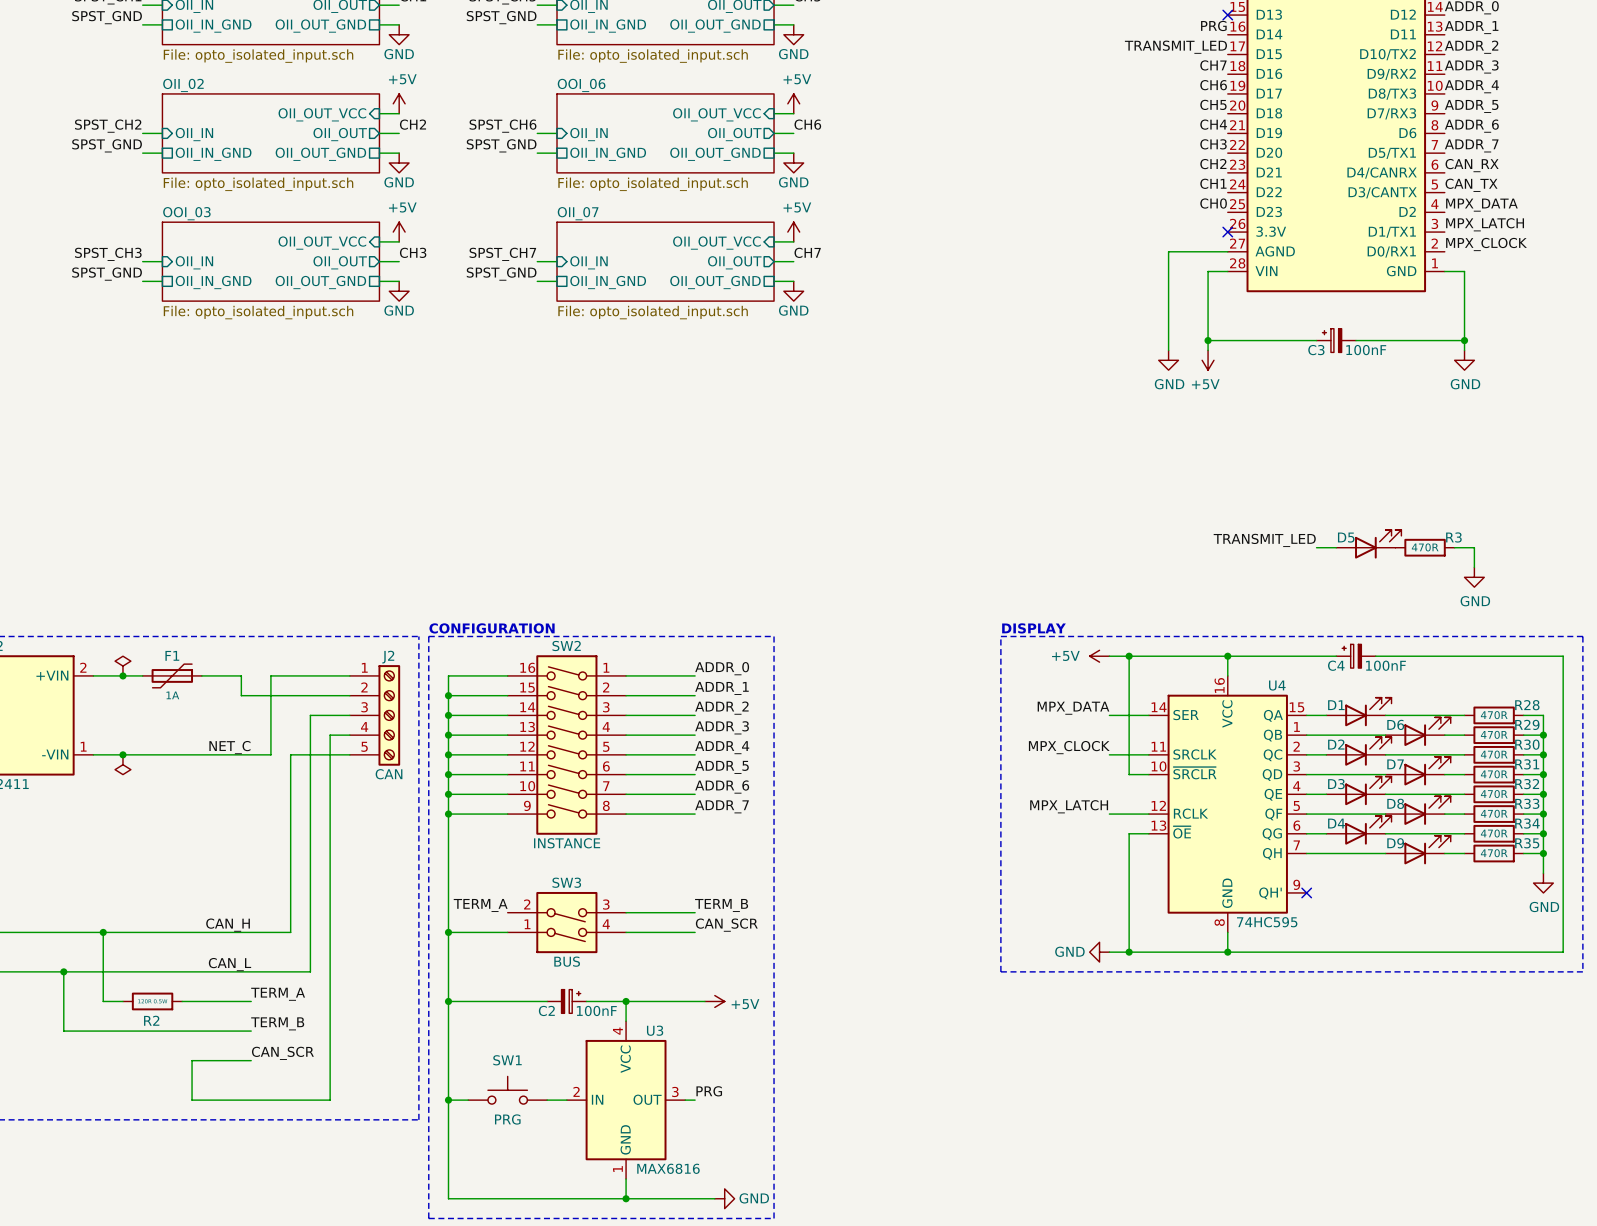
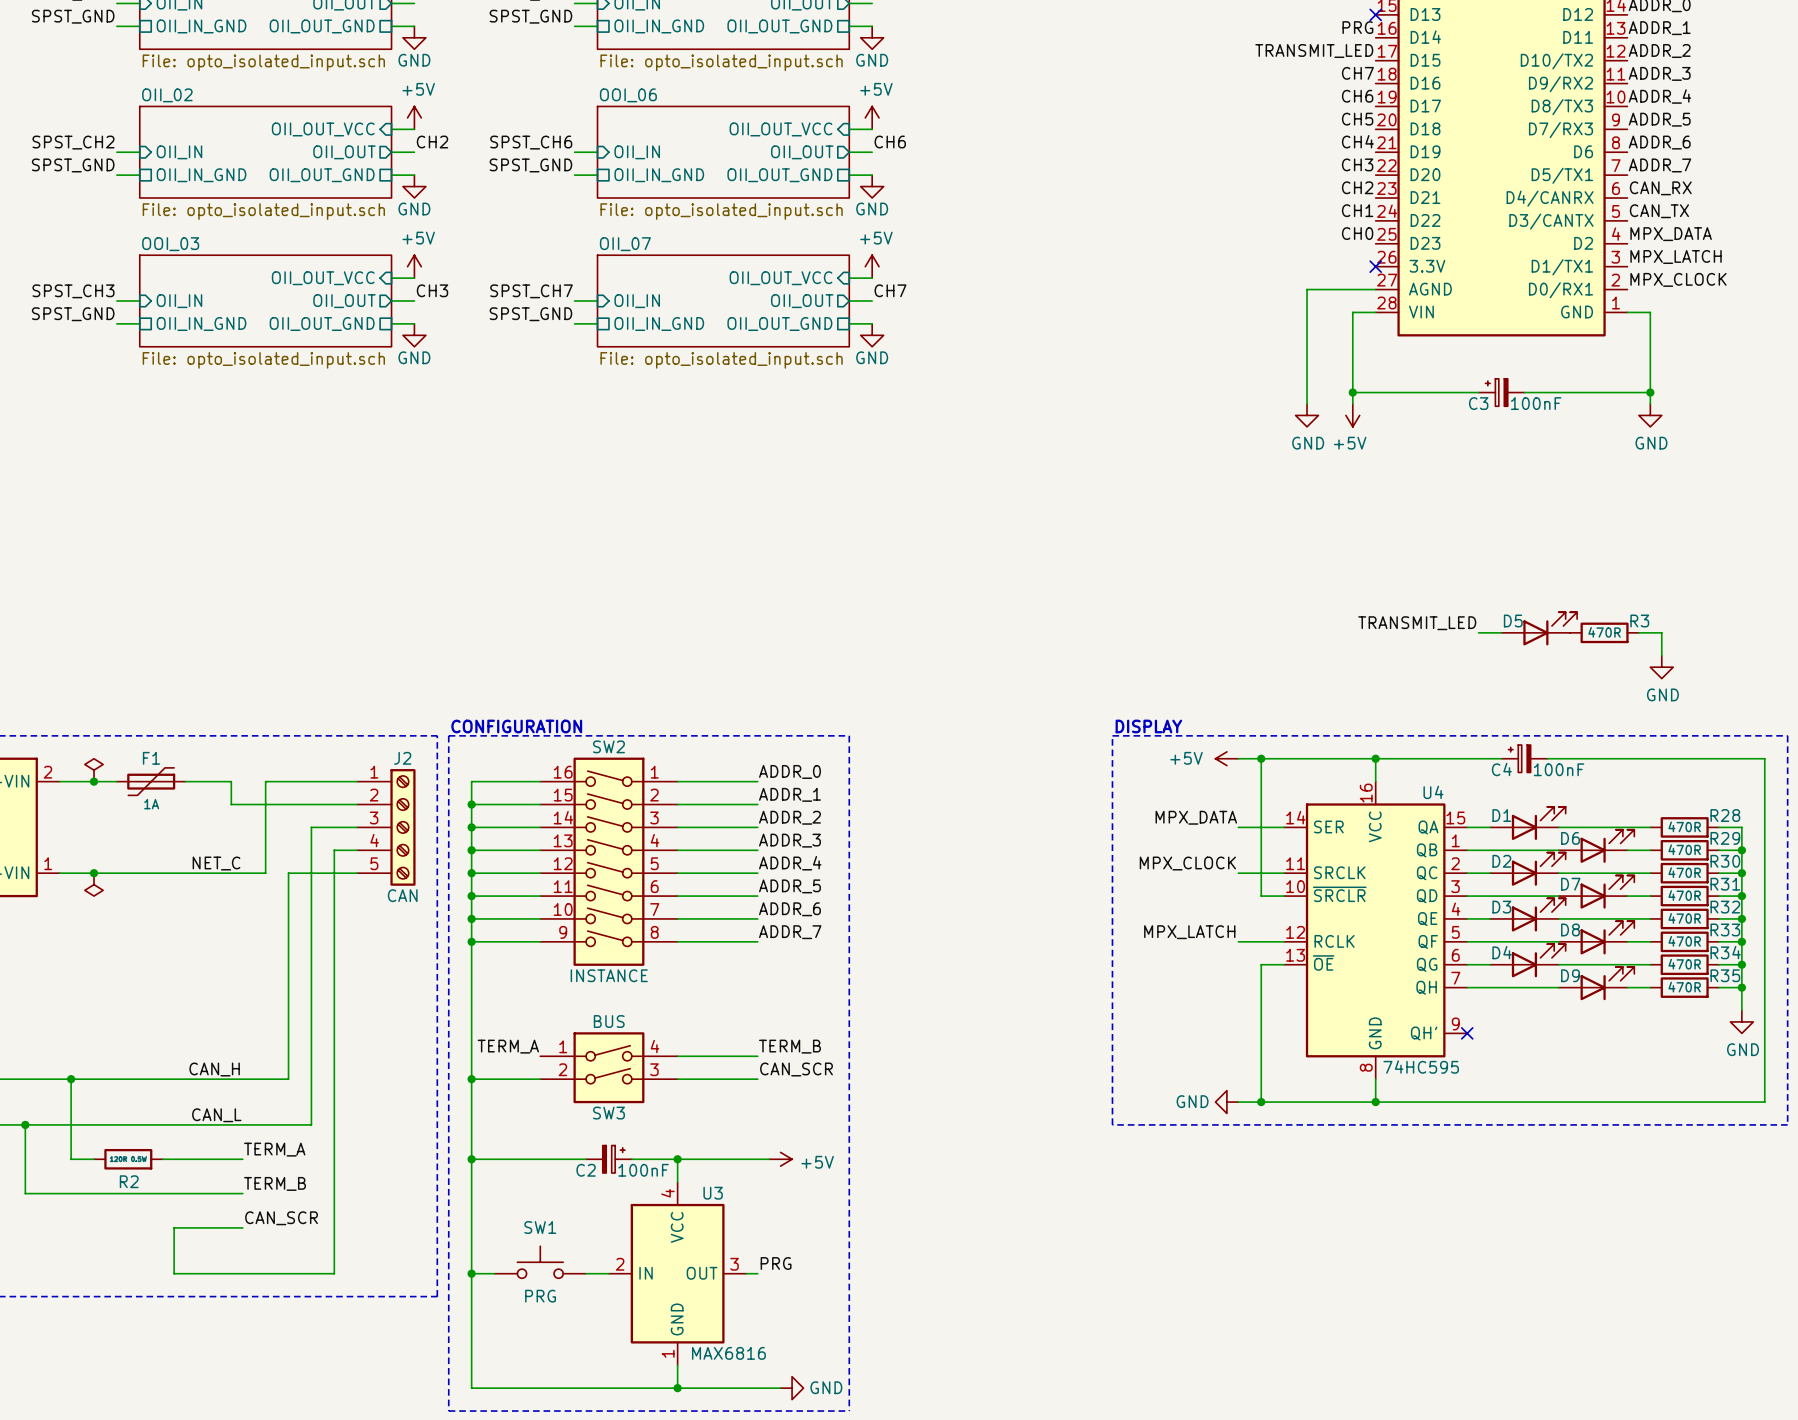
SW3 flip: as is (566, 922) -> up-down (608, 1067)

